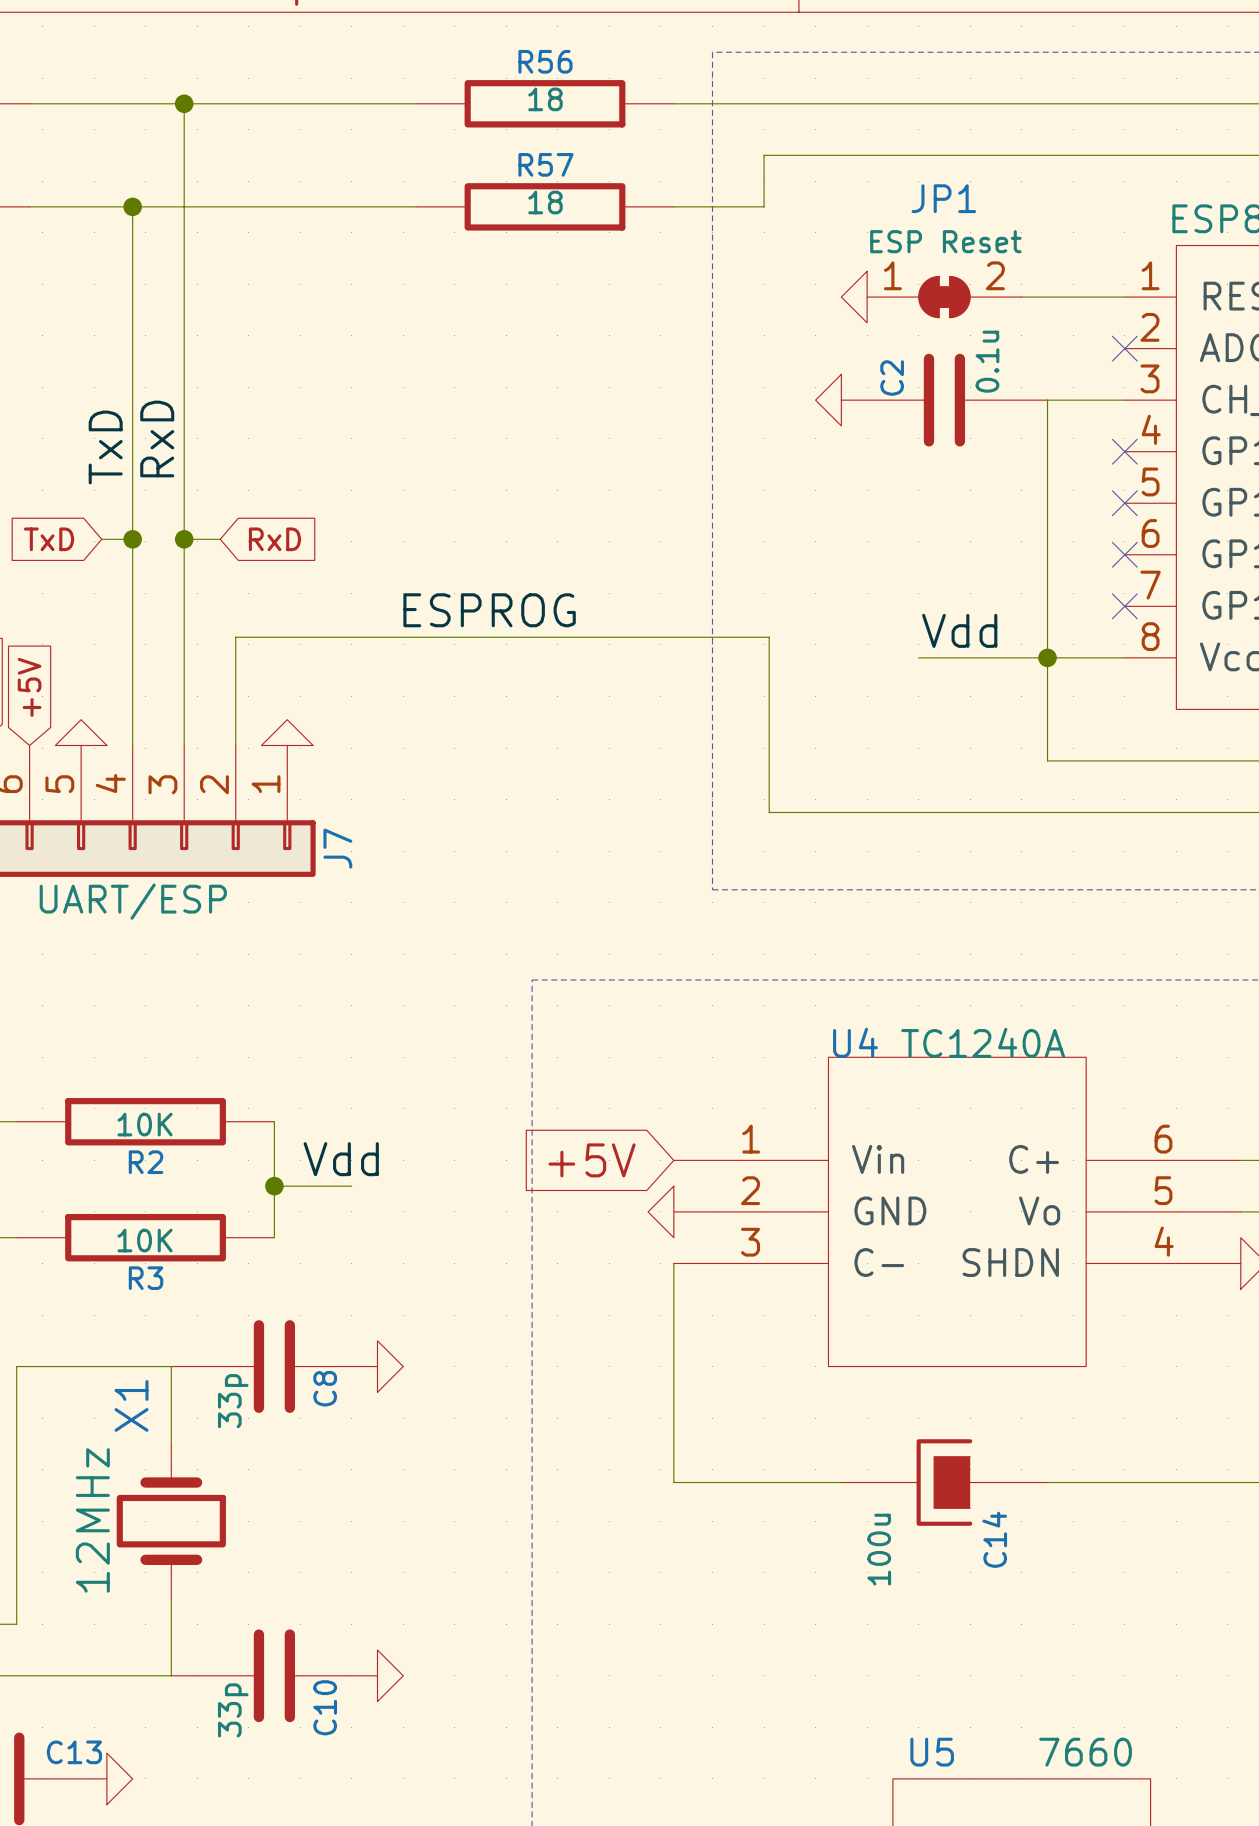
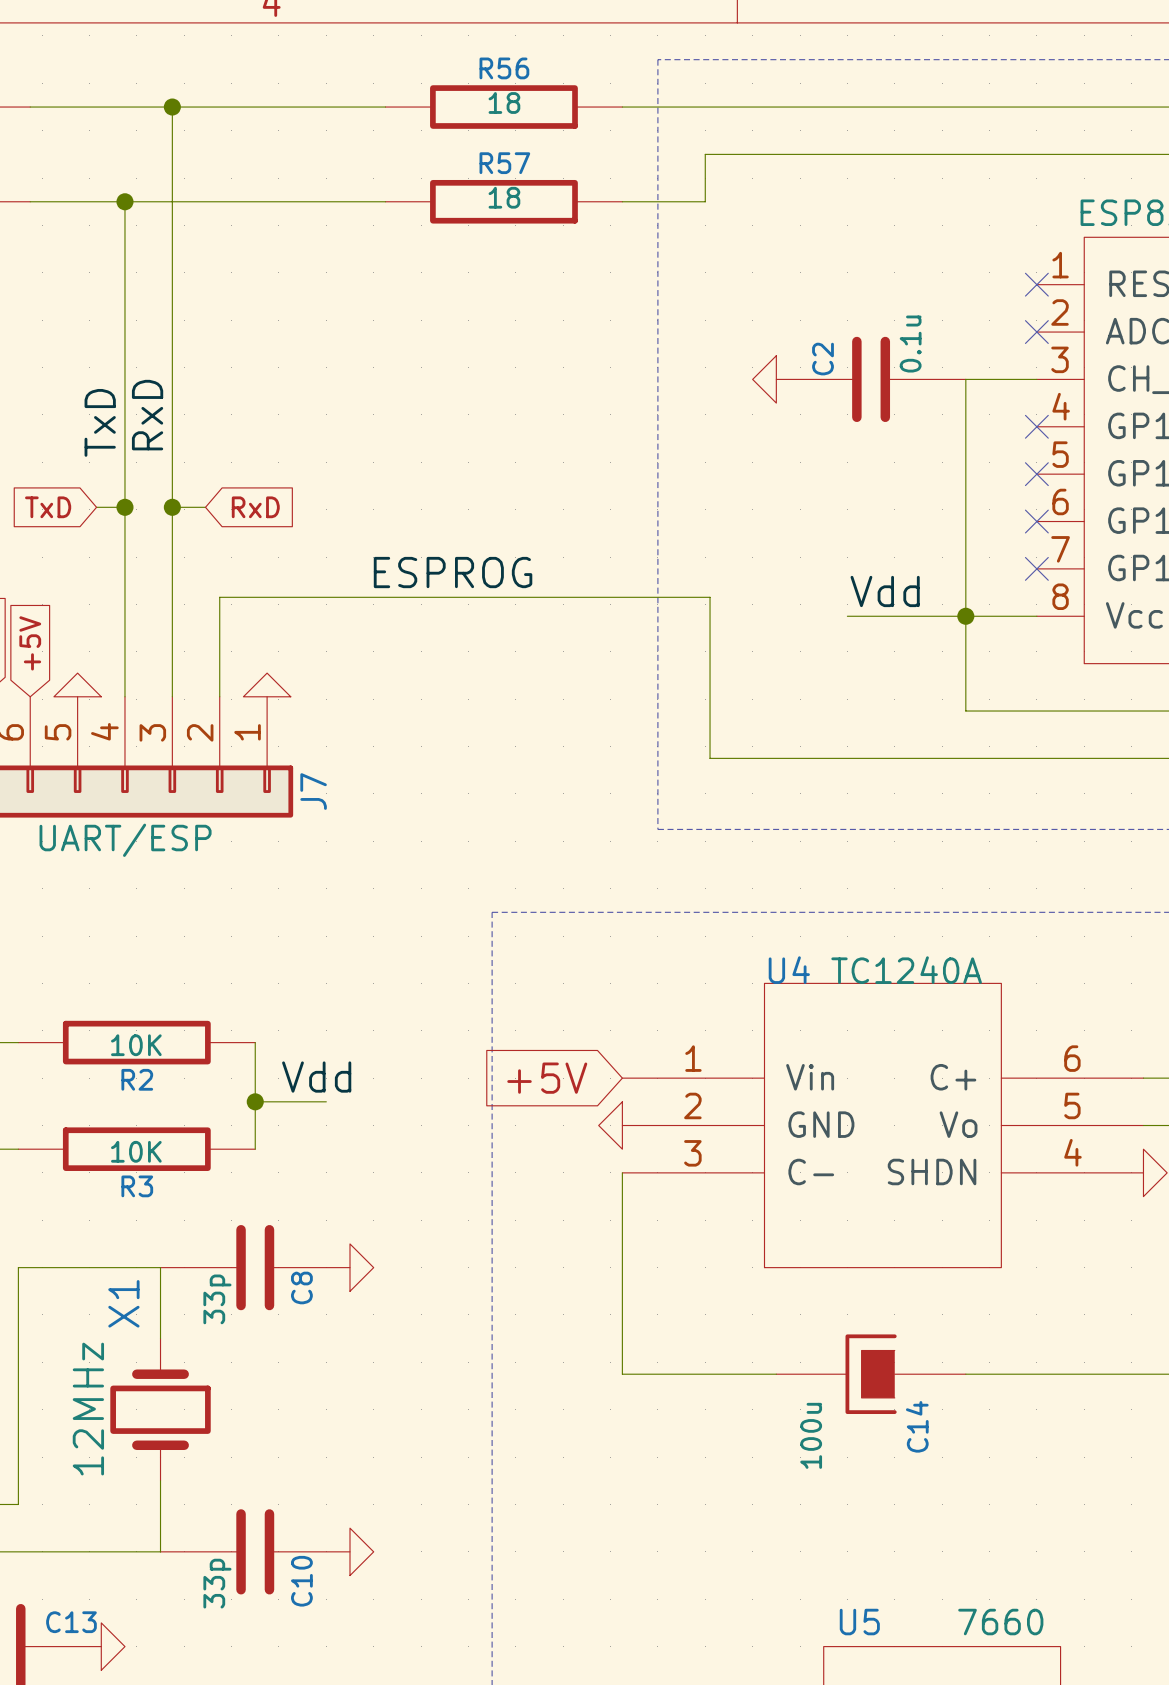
power symbol: (854, 297) -> none
JP1: ESP Reset (944, 297) -> none
wire: (1021, 297) (1124, 297) -> none
no-connect mark: none -> (1036, 284)

